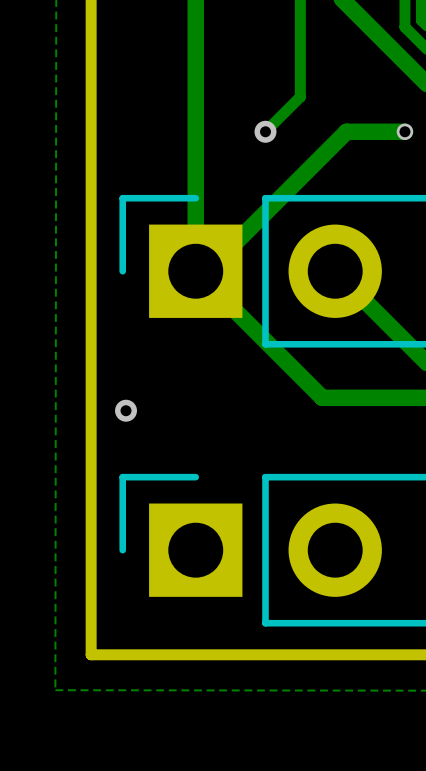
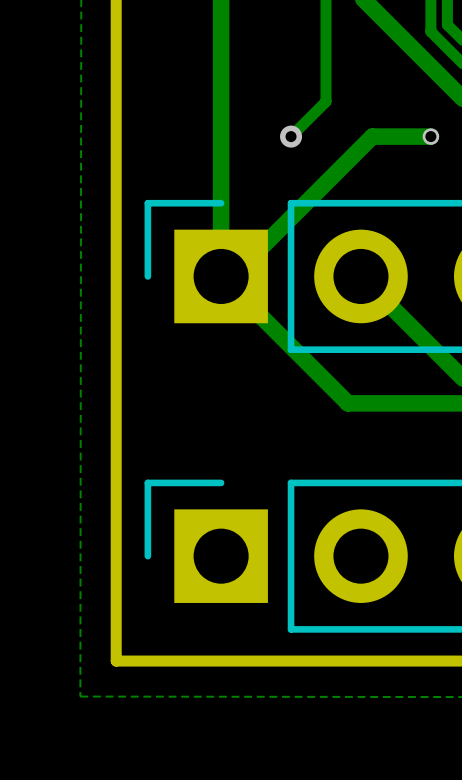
via: (126, 410) -> none

